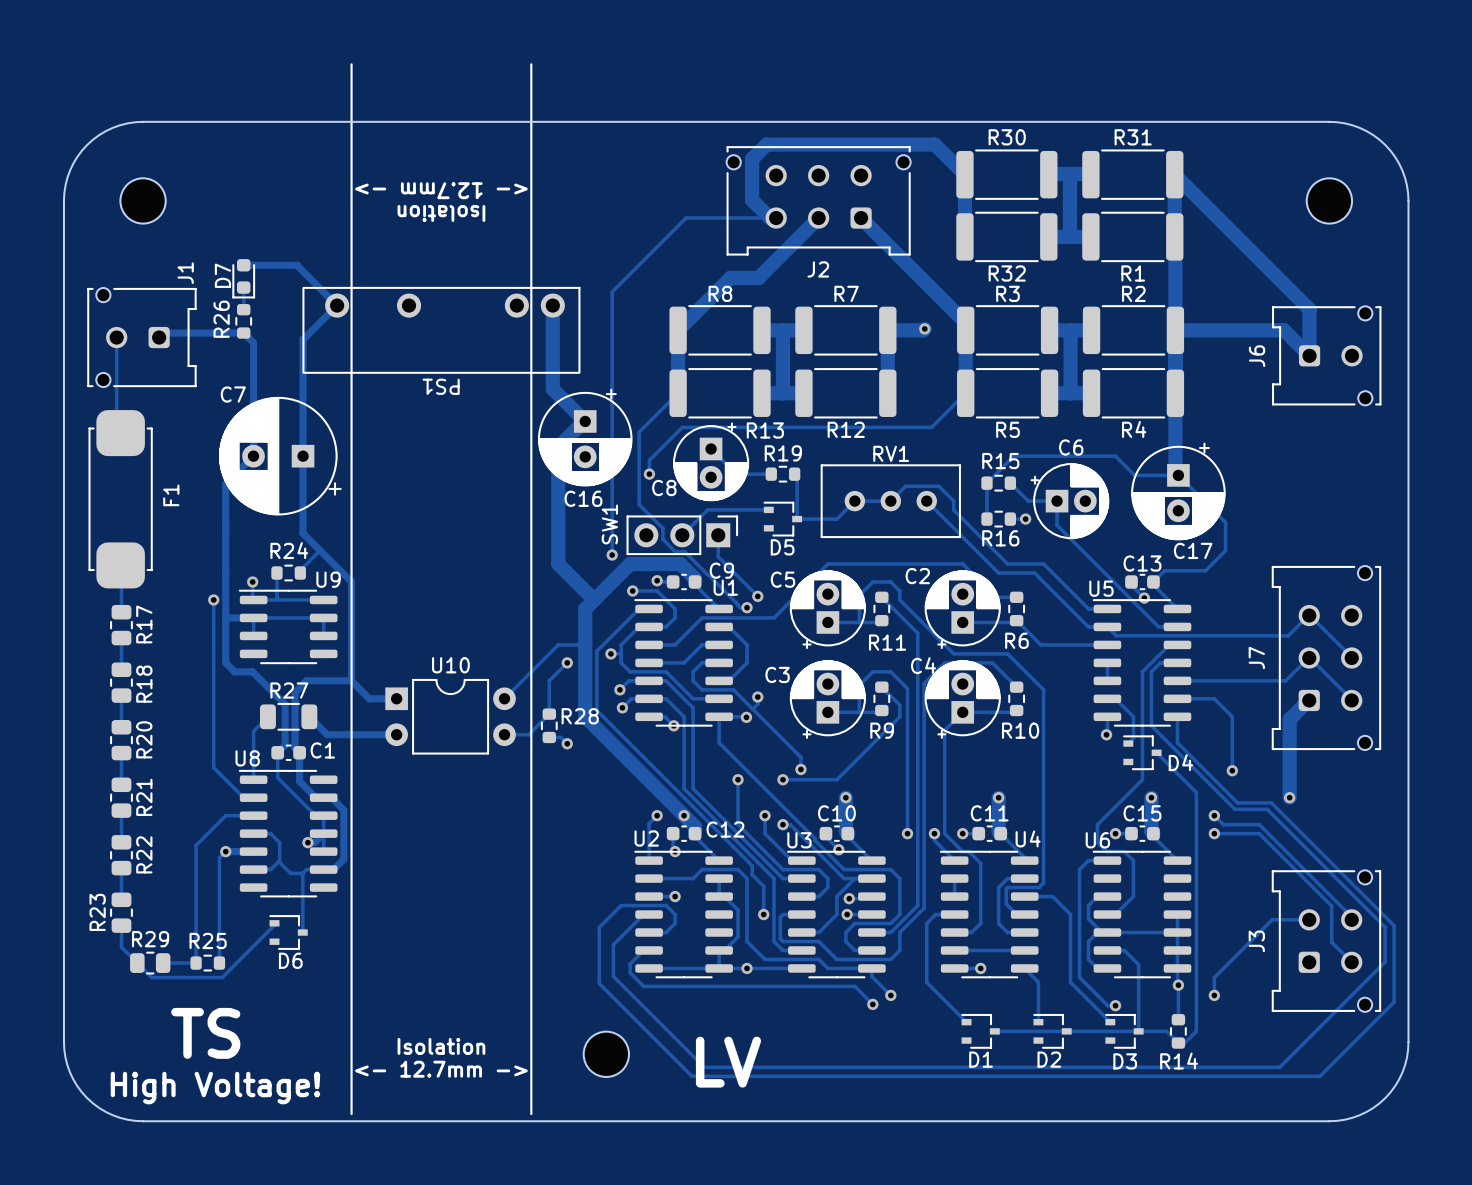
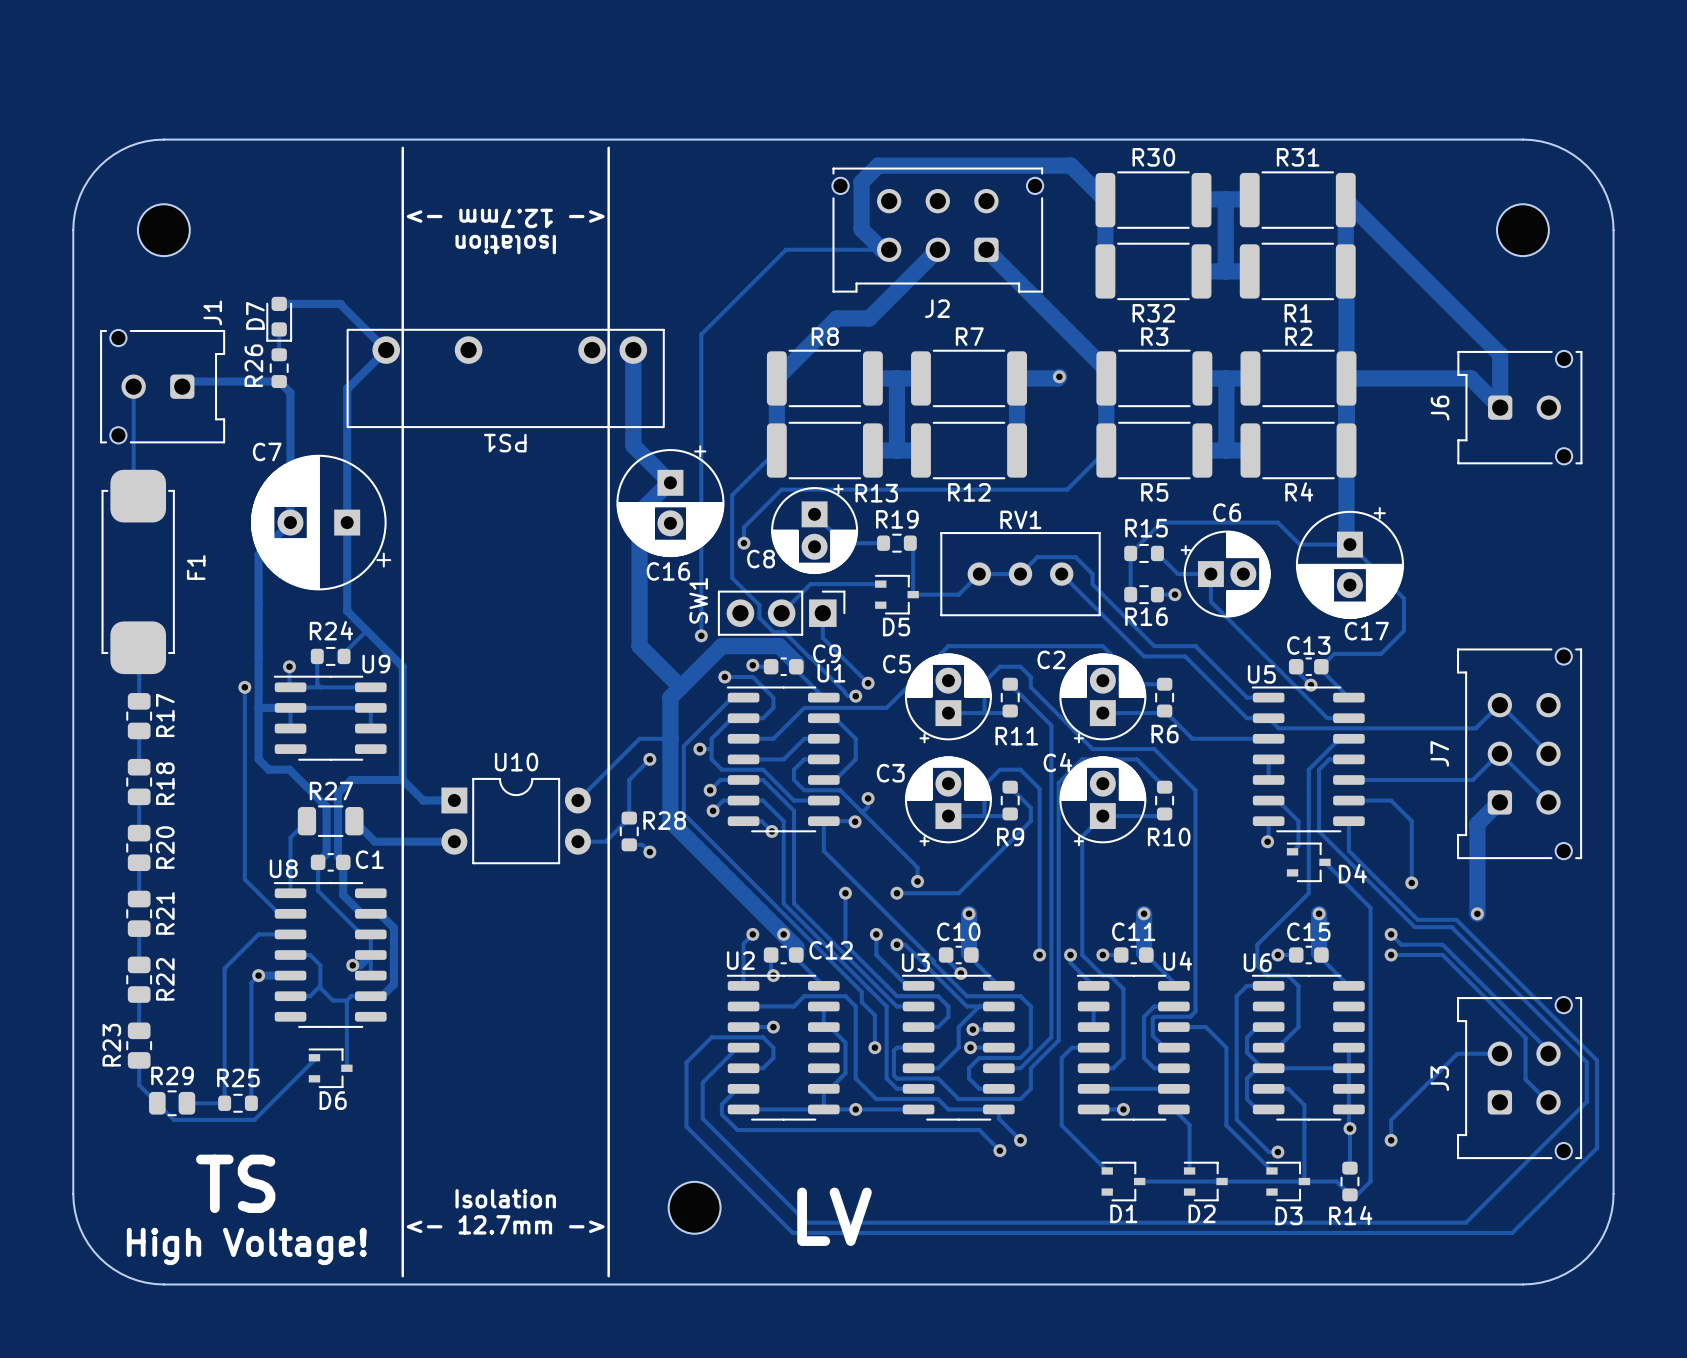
line: (351, 64) (351, 129) -> none
line: (531, 64) (531, 129) -> none

